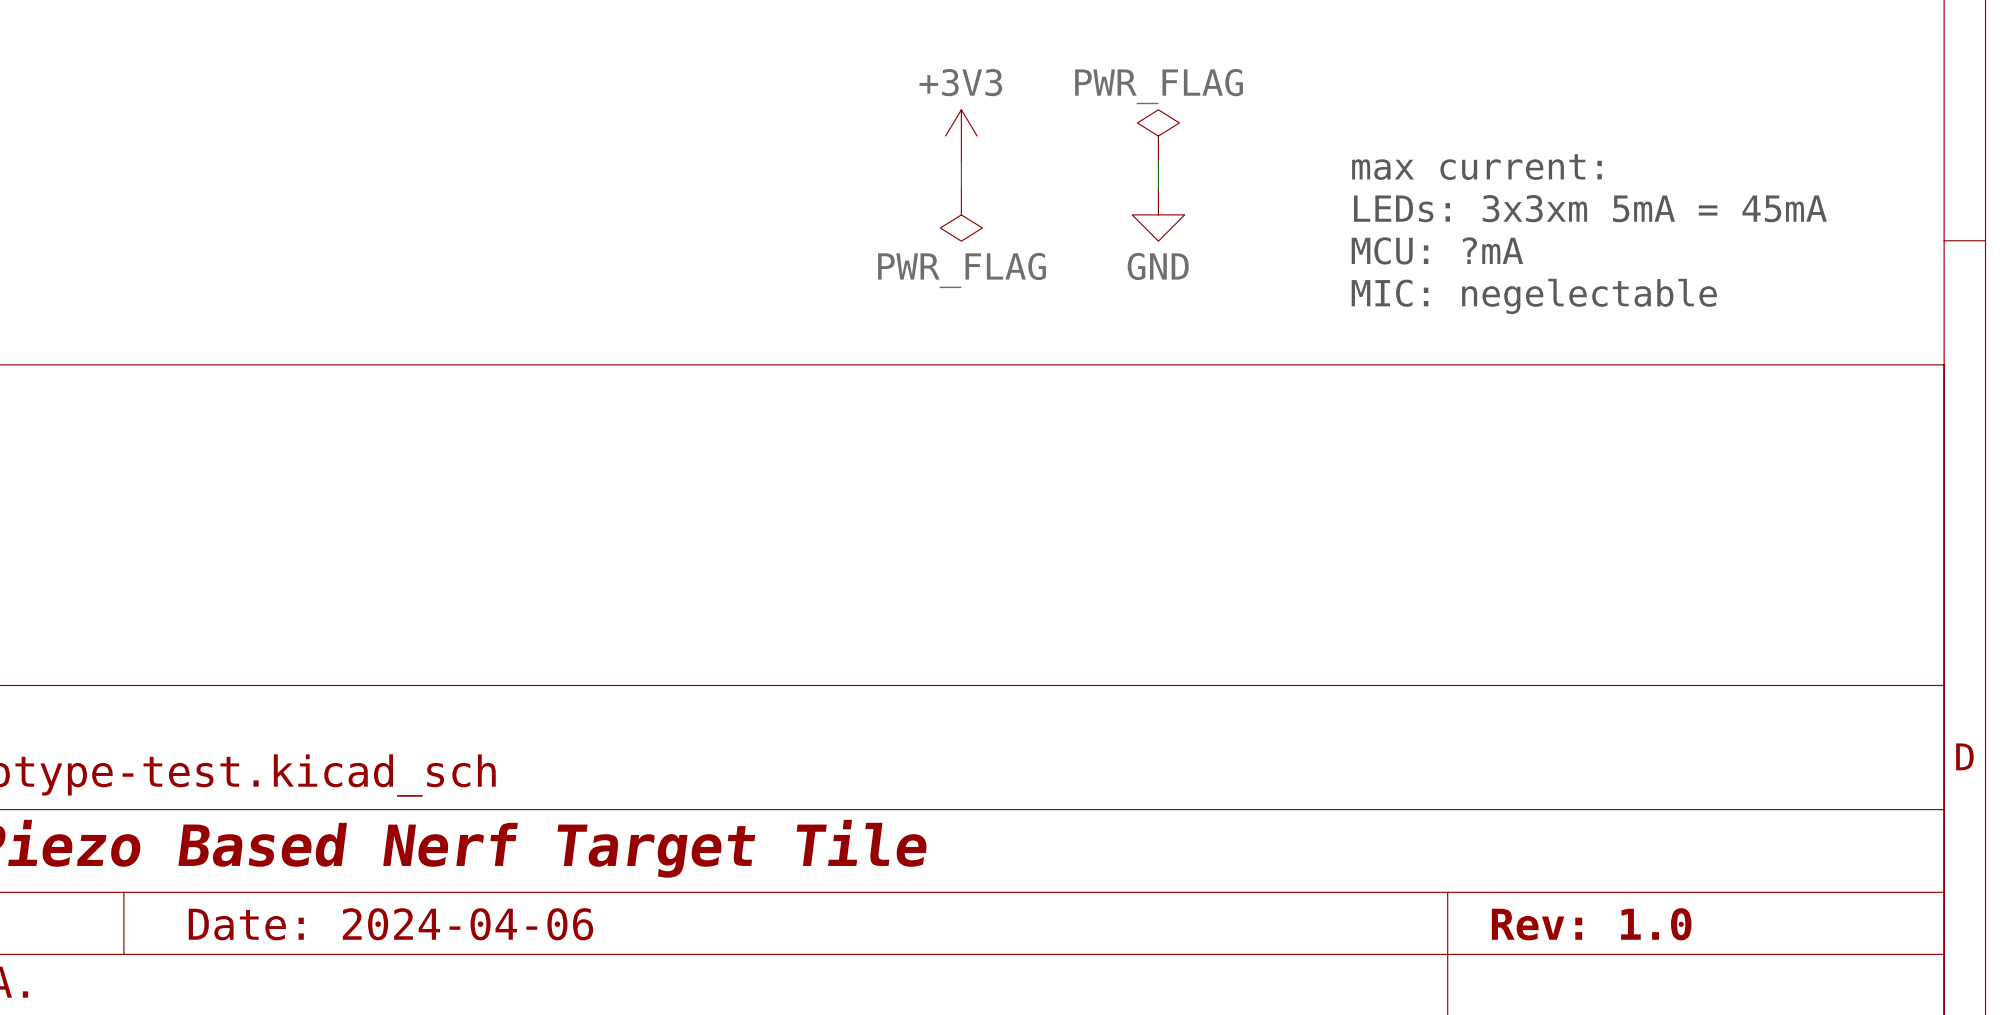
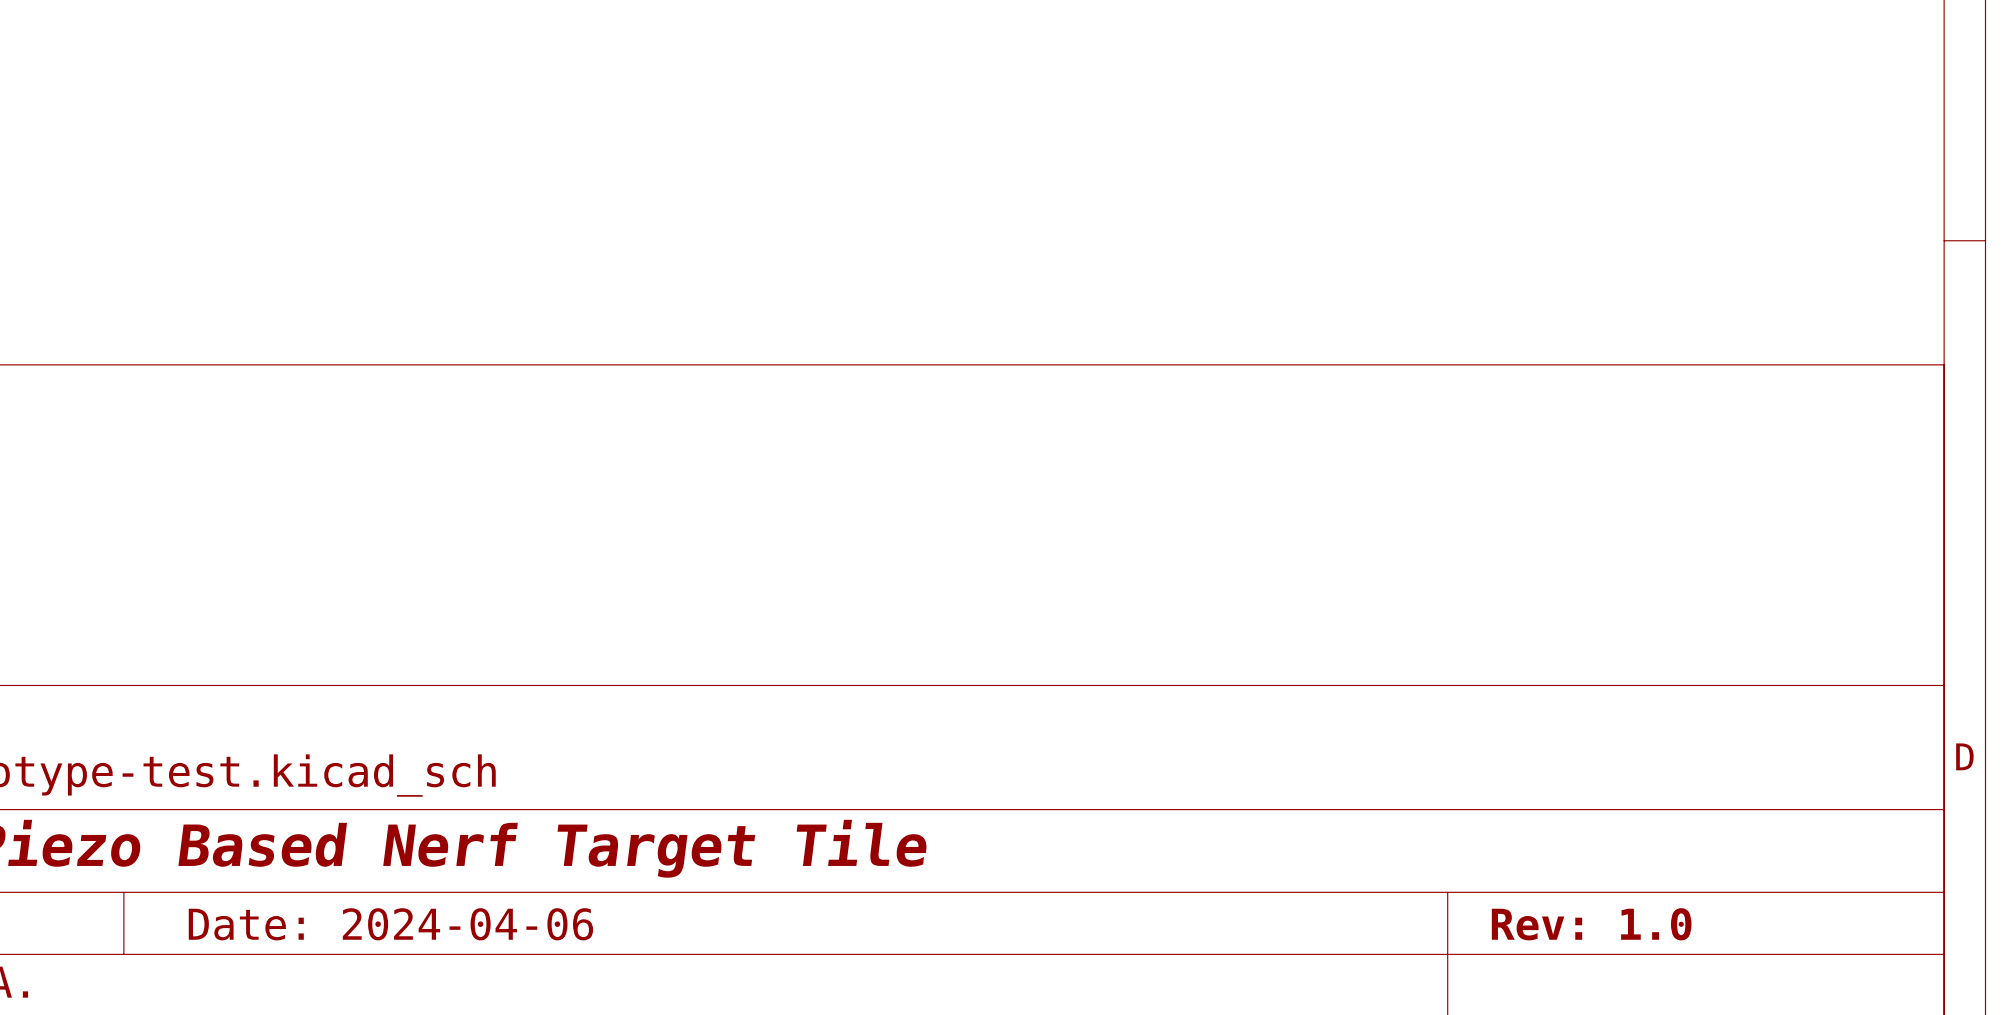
power symbol: +3V3 (961, 136) -> none
power symbol: PWR_FLAG (1158, 136) -> none
wire: (961, 162) (961, 188) -> none
wire: (1158, 162) (1158, 188) -> none
text: max current: (1476, 167) -> none
text: LEDs: 3x3xm 5mA = 45mA (1590, 208) -> none
power symbol: PWR_FLAG (961, 214) -> none
power symbol: GND (1158, 214) -> none
text: MCU: ?mA (1437, 250) -> none
text: MIC: negelectable (1534, 296) -> none

